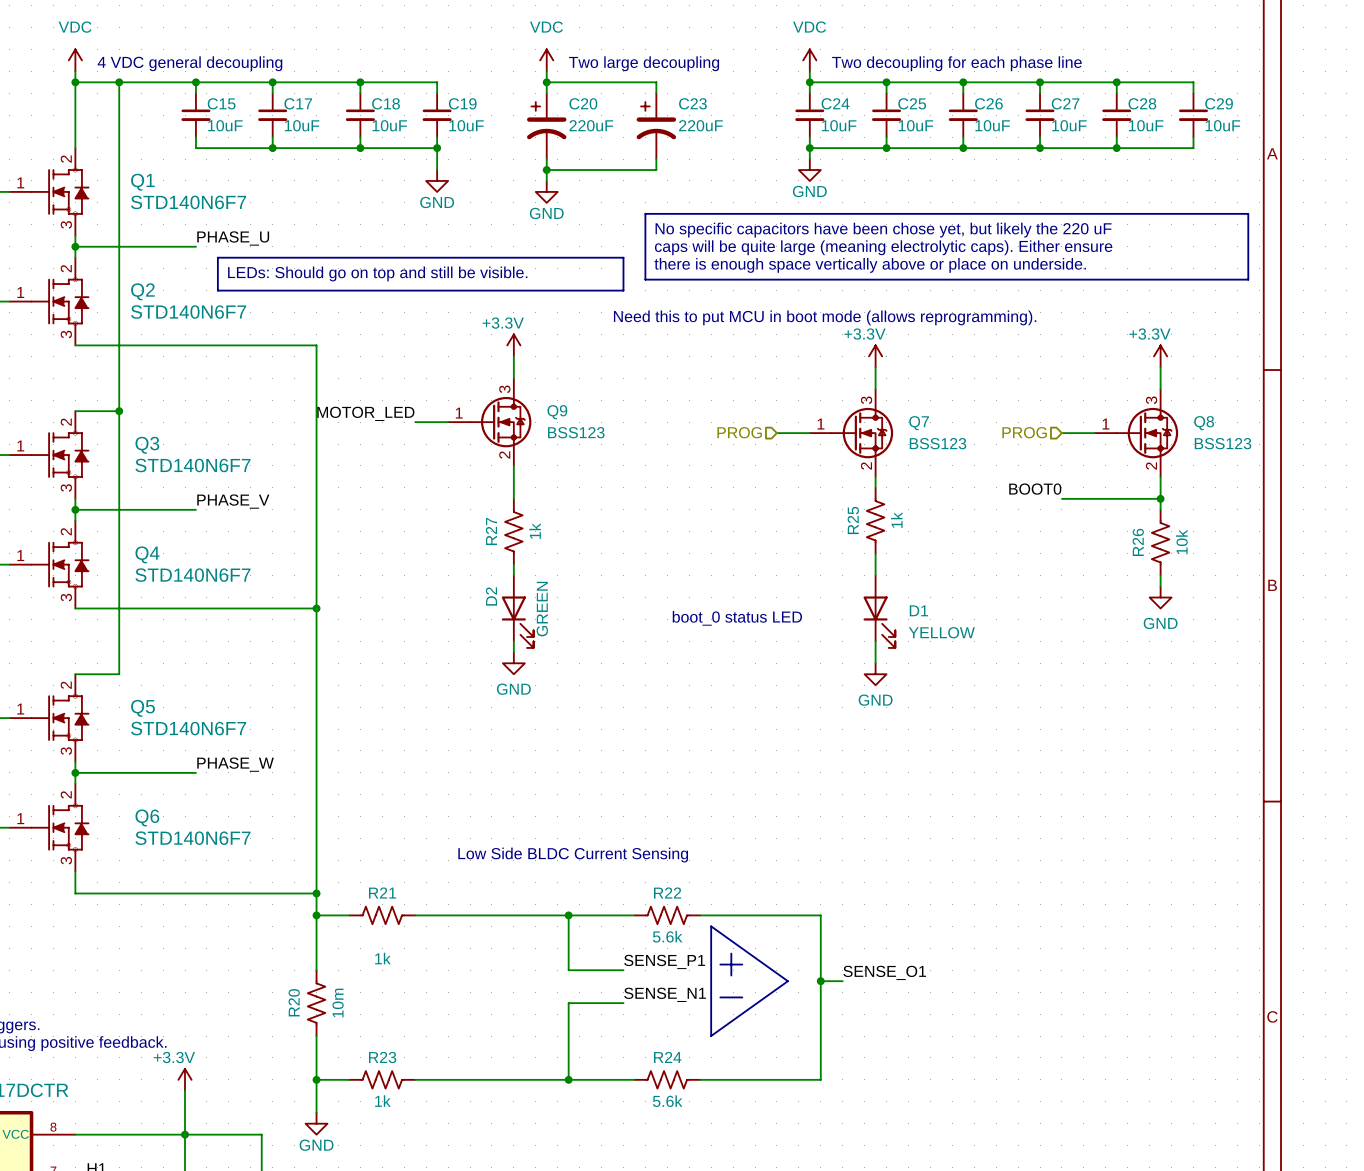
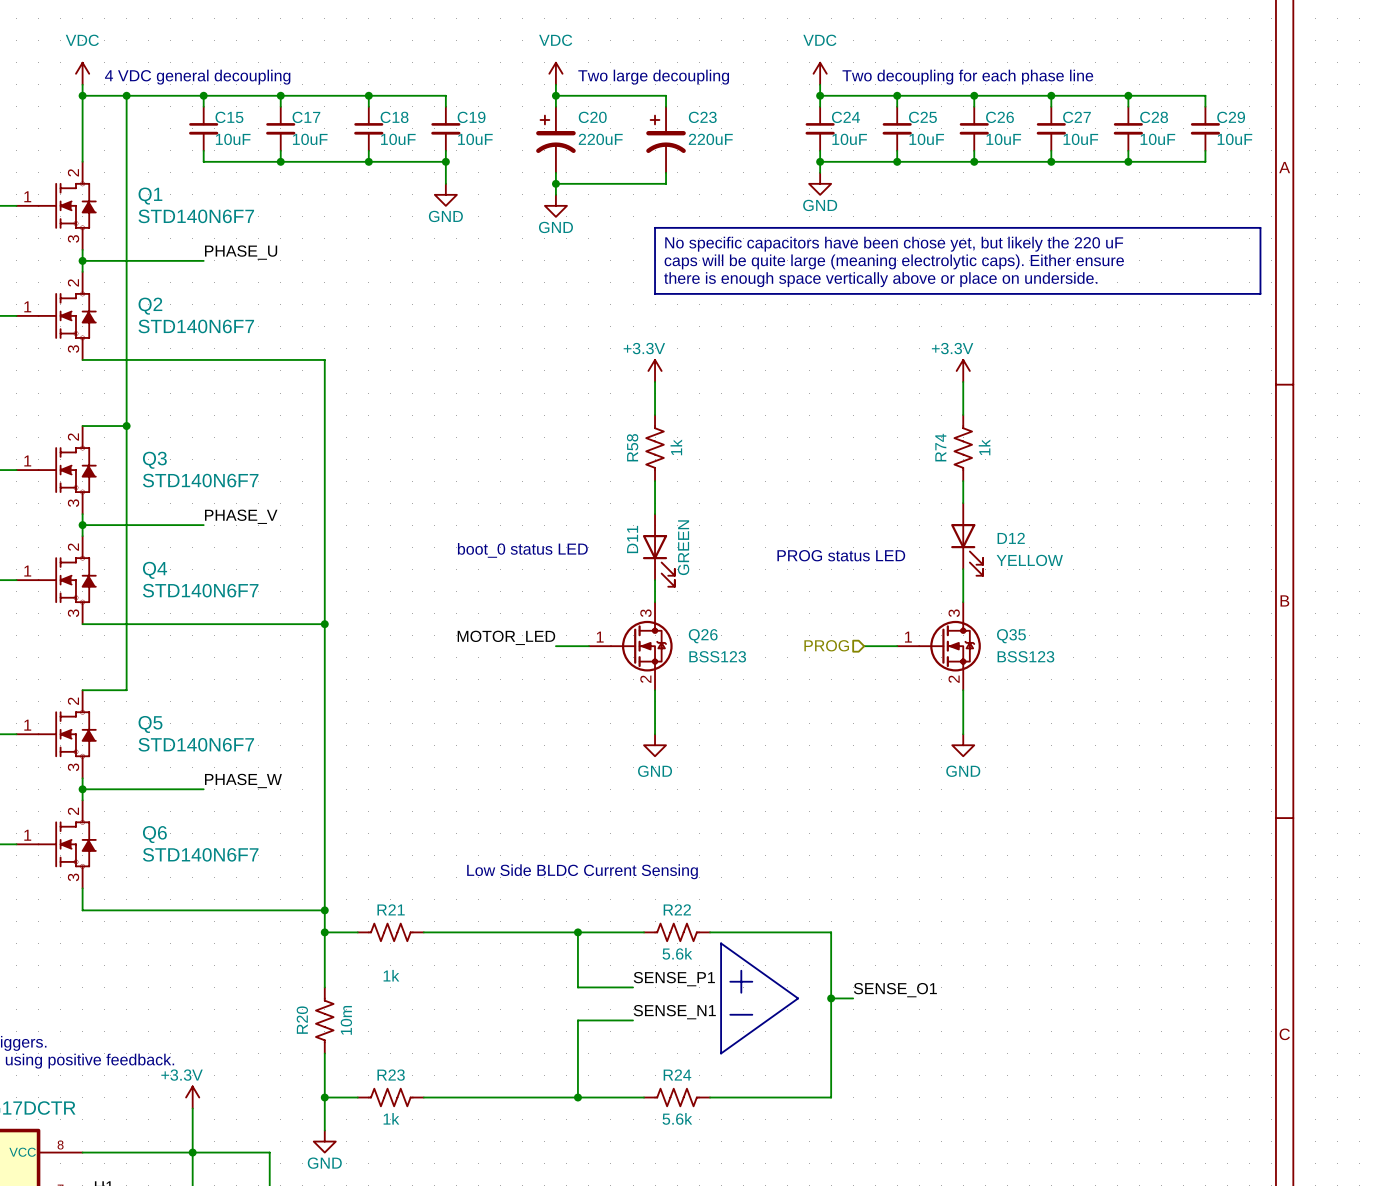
line: (217, 257) (623, 257) (623, 290) (217, 290) (217, 257) -> none
text: LEDs: Should go on top and still be visible. (377, 273) -> none
text: Need this to put MCU in boot mode (allows reprogramming). (825, 317) -> none
power symbol: +3.3V (513, 345) -> none
wire: (513, 356) (513, 378) -> none
power symbol: none -> +3.3V (655, 370)
power symbol position: +3.3V (875, 356) -> +3.3V (963, 370)
power symbol: +3.3V (1160, 356) -> none
wire: none -> (655, 381) (655, 415)
wire: (875, 367) (875, 389) -> none
wire: none -> (963, 381) (963, 415)
wire: (1160, 367) (1160, 389) -> none
label: MOTOR_LED (365, 413) -> none
wire: (415, 422) (448, 422) -> none
Q9: BSS123 (489, 422) -> none
hierarchical label: PROG (739, 432) -> none
hierarchical label: PROG (1024, 432) -> none
R58: none -> 1k (655, 448)
wire: (776, 433) (809, 433) -> (864, 646) (897, 646)
Q7: BSS123 (851, 433) -> none
R74: none -> 1k (963, 448)
wire: (1061, 433) (1094, 433) -> none
Q8: BSS123 (1136, 433) -> none
wire: (513, 465) (513, 498) -> (655, 481) (655, 514)
wire: (875, 476) (875, 487) -> none
wire: (1160, 476) (1160, 509) -> none
label: BOOT0 (1035, 489) -> none
wire: (1061, 498) (1160, 498) -> none
junction: (1160, 498) -> none
R25: 1k (875, 520) -> none
D12: none -> YELLOW (967, 539)
R27: 1k (513, 531) -> none
text: none -> boot_0 status LED (522, 550)
D11: none -> GREEN (658, 550)
text: none -> PROG status LED (841, 555)
R26: 10k (1160, 542) -> none
wire: (875, 553) (875, 575) -> (963, 481) (963, 503)
wire: none -> (963, 569) (963, 602)
wire: (513, 564) (513, 575) -> none
wire: none -> (655, 580) (655, 602)
wire: (1160, 575) (1160, 586) -> none
power symbol: GND (1160, 597) -> none
D2: GREEN (517, 611) -> none
D1: YELLOW (879, 611) -> none
text: boot_0 status LED (737, 618) -> none
label: none -> MOTOR_LED (506, 637)
wire: none -> (555, 646) (588, 646)
Q26: none -> BSS123 (630, 646)
hierarchical label: none -> PROG (826, 645)
Q35: none -> BSS123 (939, 646)
wire: (513, 641) (513, 652) -> none
wire: (875, 641) (875, 663) -> none
power symbol: GND (513, 663) -> none
wire: none -> (655, 690) (655, 734)
power symbol position: GND (875, 674) -> GND (963, 745)
wire: none -> (963, 690) (963, 734)
power symbol: none -> GND (655, 745)

